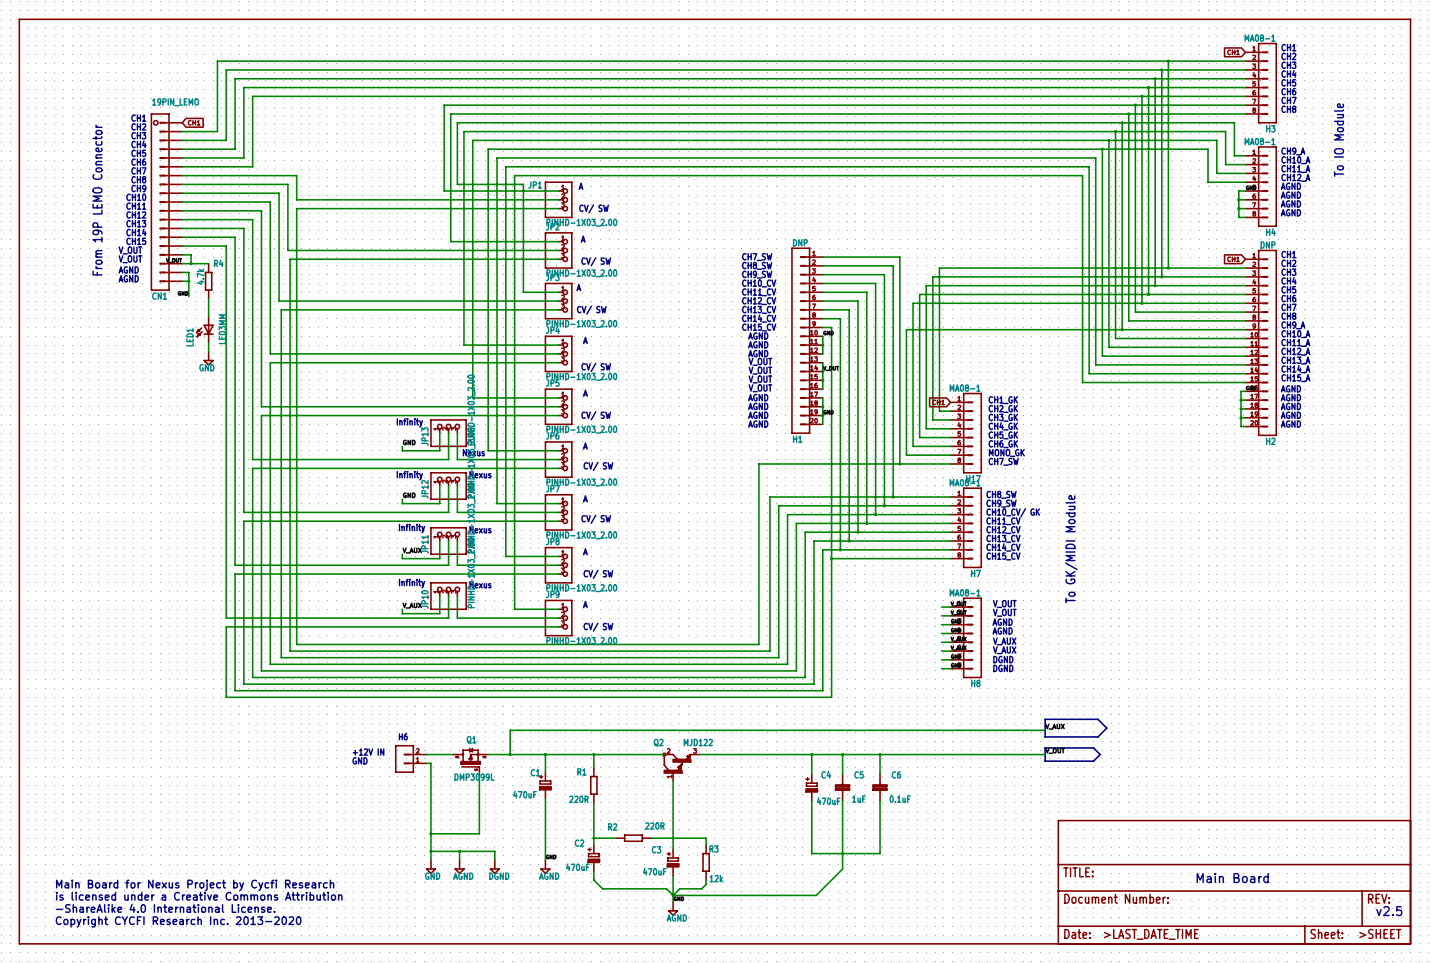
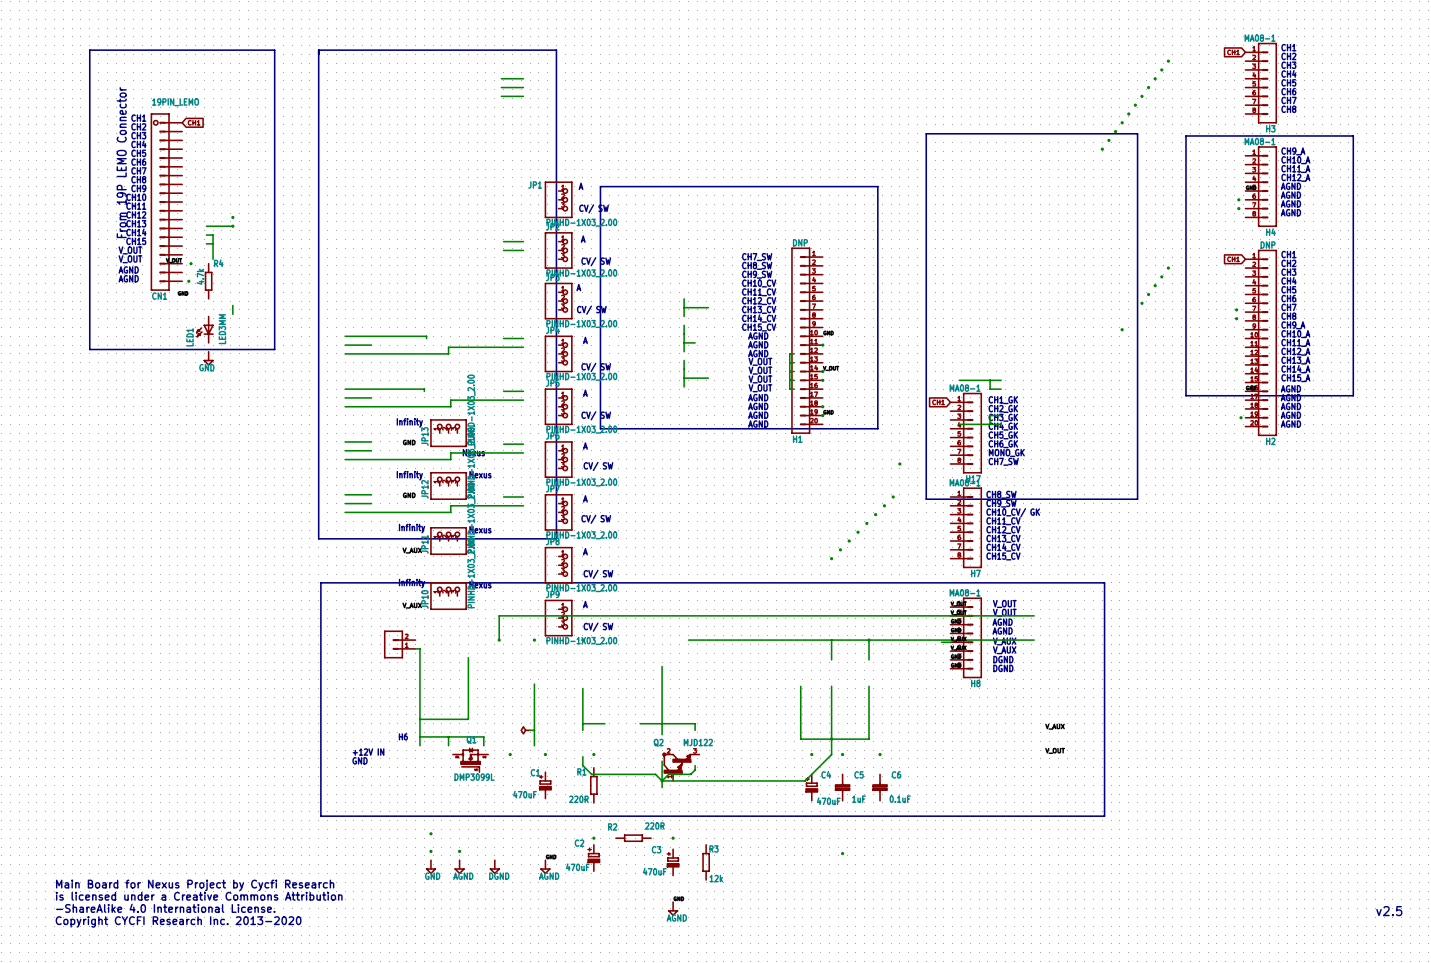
drawing: [18, 18, 1412, 945] -> none
line: none -> (89, 50) (274, 50) (274, 349) (89, 349) (89, 50)
line: none -> (318, 50) (556, 50) (556, 538) (318, 538) (318, 50)
wire: (1168, 61) (1168, 268) -> none
wire: (1245, 61) (217, 61) (217, 131) (182, 131) -> none
wire: (1161, 69) (1161, 276) -> none
wire: (1245, 69) (226, 69) (226, 140) (182, 140) -> none
wire: (501, 78) (235, 78) (235, 149) (182, 149) -> none
wire: (523, 78) (1245, 78) -> none
wire: (1155, 78) (1155, 285) -> none
wire: (501, 87) (243, 87) (243, 158) (182, 158) -> none
wire: (523, 87) (1245, 87) -> none
wire: (1148, 87) (1148, 294) -> none
wire: (501, 96) (252, 96) (252, 166) (182, 166) -> none
wire: (523, 96) (1245, 96) -> none
wire: (1141, 96) (1141, 303) -> none
wire: (1135, 105) (1135, 312) (1245, 312) -> none
wire: (1245, 105) (444, 105) (444, 191) (558, 191) -> none
wire: (1128, 113) (1128, 320) (1245, 320) -> none
wire: (1245, 113) (450, 113) (450, 241) (503, 241) -> none
wire: (1122, 122) (1122, 329) -> none
wire: (1115, 131) (1115, 338) (1245, 338) -> none
line: none -> (926, 133) (1137, 133) (1137, 499) (926, 499) (926, 133)
line: none -> (1185, 135) (1353, 135) (1353, 395) (1185, 395) (1185, 135)
wire: (1108, 140) (1108, 347) (1245, 347) -> none
text: To IO Module (1339, 140) -> none
wire: (1102, 149) (1102, 356) (1245, 356) -> none
wire: (1245, 155) (1234, 155) (1234, 122) (457, 122) (457, 184) (523, 184) (523, 292) (558, 292) -> none
wire: (1245, 164) (1225, 164) (1225, 131) (463, 131) (463, 345) (558, 345) -> none
wire: (1245, 173) (1216, 173) (1216, 140) (472, 140) (472, 397) (558, 397) -> none
wire: (182, 175) (296, 175) (296, 199) (558, 199) -> none
wire: (1245, 182) (1208, 182) (1208, 149) (488, 149) (488, 450) (558, 450) -> none
wire: (182, 184) (287, 184) (287, 250) (503, 250) -> none
line: none -> (600, 186) (877, 186) (877, 428) (600, 428) (600, 186)
wire: (1245, 191) (1238, 191) (1238, 217) (1245, 217) -> none
wire: (182, 193) (279, 193) (279, 301) (558, 301) -> none
wire: (1238, 199) (1245, 199) -> none
text position: From 19P LEMO Connector (97, 200) -> From 19P LEMO Connector (121, 162)
wire: (182, 202) (270, 202) (270, 353) (345, 353) -> none
wire: (558, 208) (296, 208) (296, 644) (758, 644) (758, 463) (950, 463) -> none
wire: (1238, 208) (1245, 208) -> none
wire: (182, 210) (261, 210) (261, 406) (345, 406) -> none
junction: none -> (232, 217)
wire: (182, 219) (252, 219) (252, 459) (345, 459) -> none
junction: none -> (232, 226)
wire: (182, 228) (243, 228) (243, 512) (345, 512) -> none
wire: (182, 237) (235, 237) (235, 565) (448, 565) (448, 541) -> none
wire: (523, 241) (558, 241) -> none
wire: (182, 246) (226, 246) (226, 618) (448, 618) (448, 596) -> none
wire: (523, 250) (558, 250) -> none
wire: (182, 254) (191, 254) (191, 263) -> none
wire: (822, 257) (899, 257) (899, 463) -> none
wire: (558, 259) (290, 259) (290, 651) (769, 651) (769, 497) (950, 497) -> none
wire: (182, 263) (208, 263) -> (206, 226) (232, 226)
wire: (822, 265) (893, 265) (893, 497) -> none
wire: (1245, 268) (939, 268) (939, 411) (950, 411) -> none
wire: (182, 272) (188, 272) (188, 296) -> (206, 235) (213, 235) (213, 259)
wire: (822, 274) (884, 274) (884, 505) -> none
wire: (1245, 276) (932, 276) (932, 419) (950, 419) -> none
wire: (182, 281) (188, 281) -> (206, 243) (213, 243)
wire: (822, 283) (875, 283) (875, 514) -> none
wire: (1245, 285) (926, 285) (926, 428) (950, 428) -> none
wire: (822, 292) (866, 292) (866, 523) -> none
wire: (1245, 294) (919, 294) (919, 437) (950, 437) -> none
wire: (208, 298) (208, 316) -> none
wire: none -> (684, 298) (684, 316)
wire: (822, 301) (858, 301) (858, 532) -> none
wire: (1245, 303) (913, 303) (913, 446) (950, 446) -> none
wire: none -> (684, 307) (708, 307)
wire: (558, 309) (281, 309) (281, 657) (778, 657) (778, 505) (950, 505) -> none
wire: (822, 309) (849, 309) (849, 541) -> none
junction: none -> (1236, 309)
wire: (822, 318) (840, 318) (840, 549) -> none
junction: none -> (1236, 318)
wire: none -> (684, 325) (684, 351)
wire: (822, 327) (831, 327) (831, 640) -> none
wire: (1245, 329) (906, 329) (906, 455) (950, 455) -> none
wire: none -> (345, 336) (426, 336) (426, 338)
wire: (822, 336) (822, 353) -> none
wire: none -> (503, 338) (523, 338)
wire: (208, 342) (208, 351) -> (232, 305) (232, 314)
wire: none -> (684, 342) (695, 342)
wire: none -> (345, 345) (371, 345)
wire: (448, 353) (558, 353) -> (448, 353) (448, 347) (523, 347)
wire: none -> (794, 353) (789, 353) (789, 389) (794, 389)
wire: none -> (684, 360) (684, 386)
wire: (558, 362) (270, 362) (270, 664) (787, 664) (787, 514) (950, 514) -> none
wire: none -> (789, 362) (794, 362)
wire: (822, 362) (822, 389) -> none
wire: (1245, 364) (1095, 364) (1095, 158) (497, 158) (497, 503) (558, 503) -> none
wire: none -> (789, 371) (794, 371)
wire: (1245, 373) (1089, 373) (1089, 166) (505, 166) (505, 556) (558, 556) -> none
wire: none -> (684, 378) (708, 378)
wire: none -> (789, 380) (794, 380)
wire: none -> (959, 380) (1001, 380)
wire: none -> (990, 380) (990, 389) (1001, 389)
wire: (1245, 382) (1082, 382) (1082, 175) (514, 175) (514, 609) (558, 609) -> none
wire: none -> (345, 389) (424, 389) (424, 391)
wire: none -> (503, 391) (523, 391)
wire: (1245, 391) (1241, 391) (1241, 426) (1245, 426) -> none
wire: none -> (345, 397) (371, 397)
wire: (822, 397) (822, 424) -> none
wire: (1241, 400) (1245, 400) -> none
wire: (450, 406) (558, 406) -> (450, 406) (450, 400) (523, 400)
wire: (1241, 408) (1245, 408) -> none
wire: (558, 415) (261, 415) (261, 670) (796, 670) (796, 523) (950, 523) -> none
wire: none -> (1001, 415) (990, 415) (990, 424)
wire: none -> (959, 424) (1001, 424)
wire: (439, 433) (439, 450) (402, 450) (402, 446) -> none
wire: (448, 433) (448, 459) -> (523, 452) (450, 452) (450, 459) (448, 459)
wire: (457, 433) (457, 459) (558, 459) -> none
wire: none -> (345, 441) (371, 441)
wire: none -> (503, 444) (523, 444)
wire: none -> (345, 450) (371, 450)
wire: (558, 468) (252, 468) (252, 677) (805, 677) (805, 532) (950, 532) -> none
wire: (439, 485) (439, 503) (402, 503) (402, 499) -> none
wire: (448, 485) (448, 512) -> (523, 505) (450, 505) (450, 512) (448, 512)
wire: (457, 485) (457, 512) (558, 512) -> none
wire: none -> (345, 494) (371, 494)
wire: none -> (503, 497) (523, 497)
wire: none -> (345, 503) (371, 503)
wire: (558, 521) (243, 521) (243, 684) (813, 684) (813, 541) (950, 541) -> none
wire: (439, 541) (439, 558) (402, 558) (402, 554) -> none
wire: (457, 541) (457, 565) (558, 565) -> none
wire: (950, 549) (822, 549) (822, 690) (235, 690) (235, 574) (558, 574) -> none
text: To GK/MIDI Module (1071, 549) -> none
wire: (831, 558) (950, 558) -> none
line: none -> (320, 582) (1104, 582) (1104, 816) (320, 816) (320, 582)
wire: (439, 596) (439, 613) (402, 613) (402, 609) -> none
wire: (457, 596) (457, 618) (558, 618) -> none
wire: (941, 607) (950, 607) -> none
wire: none -> (941, 615) (499, 615) (499, 640)
wire: none -> (950, 615) (1034, 615)
wire: (941, 624) (950, 624) -> none
wire: (558, 626) (226, 626) (226, 697) (831, 697) -> (662, 780) (805, 780) (831, 754) (831, 697)
wire: (941, 633) (950, 633) -> none
junction: none -> (499, 640)
junction: none -> (534, 640)
junction: none -> (582, 640)
wire: none -> (688, 640) (1034, 640)
wire: none -> (869, 640) (869, 659)
part: none -> (399, 644)
wire: none -> (415, 648) (419, 648) (419, 745)
wire: (941, 651) (950, 651) -> none
wire: none -> (468, 657) (468, 719) (419, 719)
wire: (831, 659) (831, 686) -> none
wire: (941, 659) (950, 659) -> none
wire: none -> (662, 666) (662, 734)
wire: (941, 668) (950, 668) -> none
wire: none -> (534, 684) (534, 745)
wire: none -> (800, 686) (800, 739) (869, 739) (869, 686)
wire: none -> (582, 688) (582, 730)
line: (1045, 719) (1097, 719) (1106, 728) (1097, 736) (1045, 736) (1045, 719) -> none
wire: none -> (582, 723) (604, 723)
wire: none -> (640, 723) (695, 723) (695, 730)
power symbol: none -> (525, 730)
wire: (530, 730) (510, 730) (510, 754) -> none
wire: (534, 730) (1045, 730) -> none
wire: none -> (419, 736) (483, 736) (483, 745)
wire: none -> (448, 736) (448, 745)
line: (1045, 747) (1045, 761) (1093, 761) (1100, 754) (1093, 747) (1045, 747) -> none
wire: (426, 754) (452, 754) -> none
wire: (488, 754) (664, 754) -> none
wire: (545, 754) (545, 772) -> none
wire: (593, 754) (593, 767) -> none
wire: (699, 754) (1045, 754) -> none
wire: (811, 754) (811, 774) -> none
wire: (842, 754) (842, 774) -> none
wire: (880, 754) (880, 774) -> none
wire: none -> (582, 756) (582, 765) (591, 774) (655, 774) (662, 780)
part: (410, 758) -> none
wire: none -> (662, 761) (662, 787)
wire: (426, 763) (430, 763) (430, 860) -> none
wire: none -> (695, 765) (695, 769) (690, 774) (668, 774) (662, 780)
wire: (479, 772) (479, 833) (430, 833) -> none
wire: (673, 780) (673, 849) -> none
wire: (545, 798) (545, 860) -> none
wire: (811, 800) (811, 853) (880, 853) (880, 800) -> none
wire: (842, 800) (842, 869) (816, 895) (673, 895) -> none
wire: (593, 802) (593, 844) -> none
wire: (593, 838) (615, 838) -> none
wire: (651, 838) (706, 838) (706, 844) -> none
wire: (430, 851) (494, 851) (494, 860) -> none
wire: (459, 851) (459, 860) -> none
wire: (593, 871) (593, 880) (602, 888) (666, 888) (673, 895) -> none
wire: (673, 875) (673, 902) -> none
text: Main Board (1232, 878) -> none
wire: (706, 880) (706, 884) (701, 888) (679, 888) (673, 895) -> none

